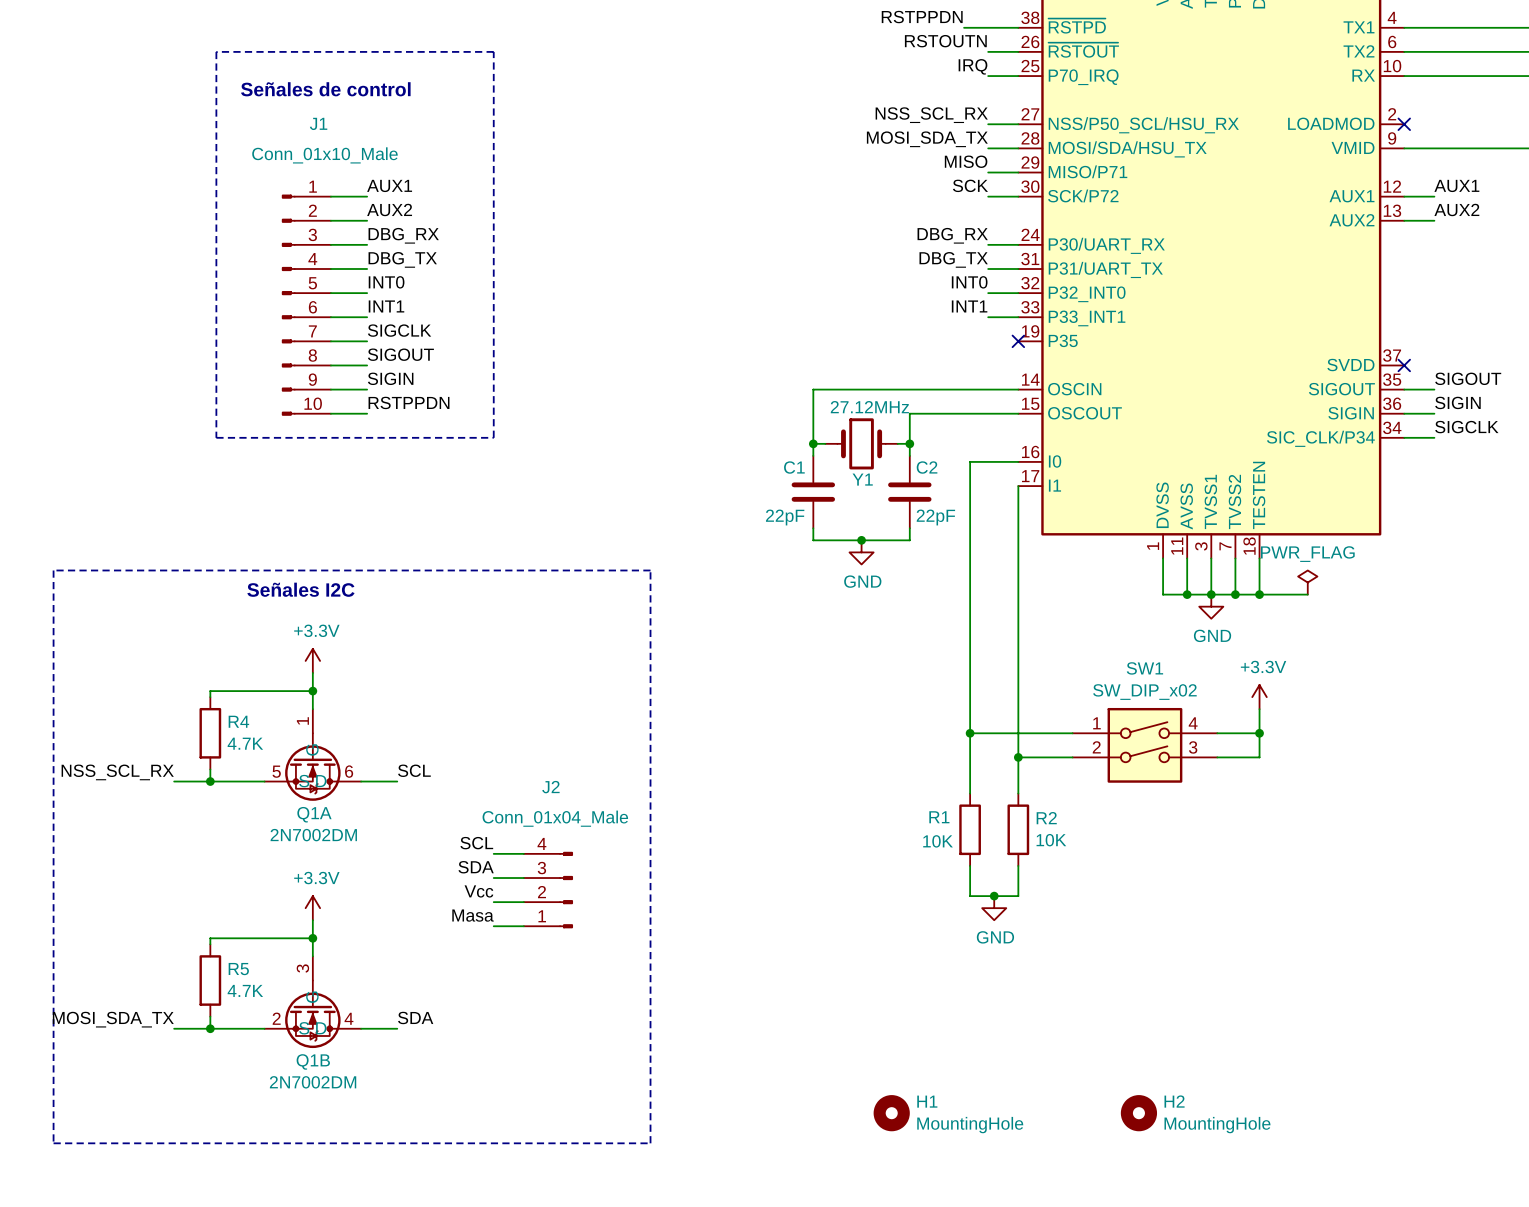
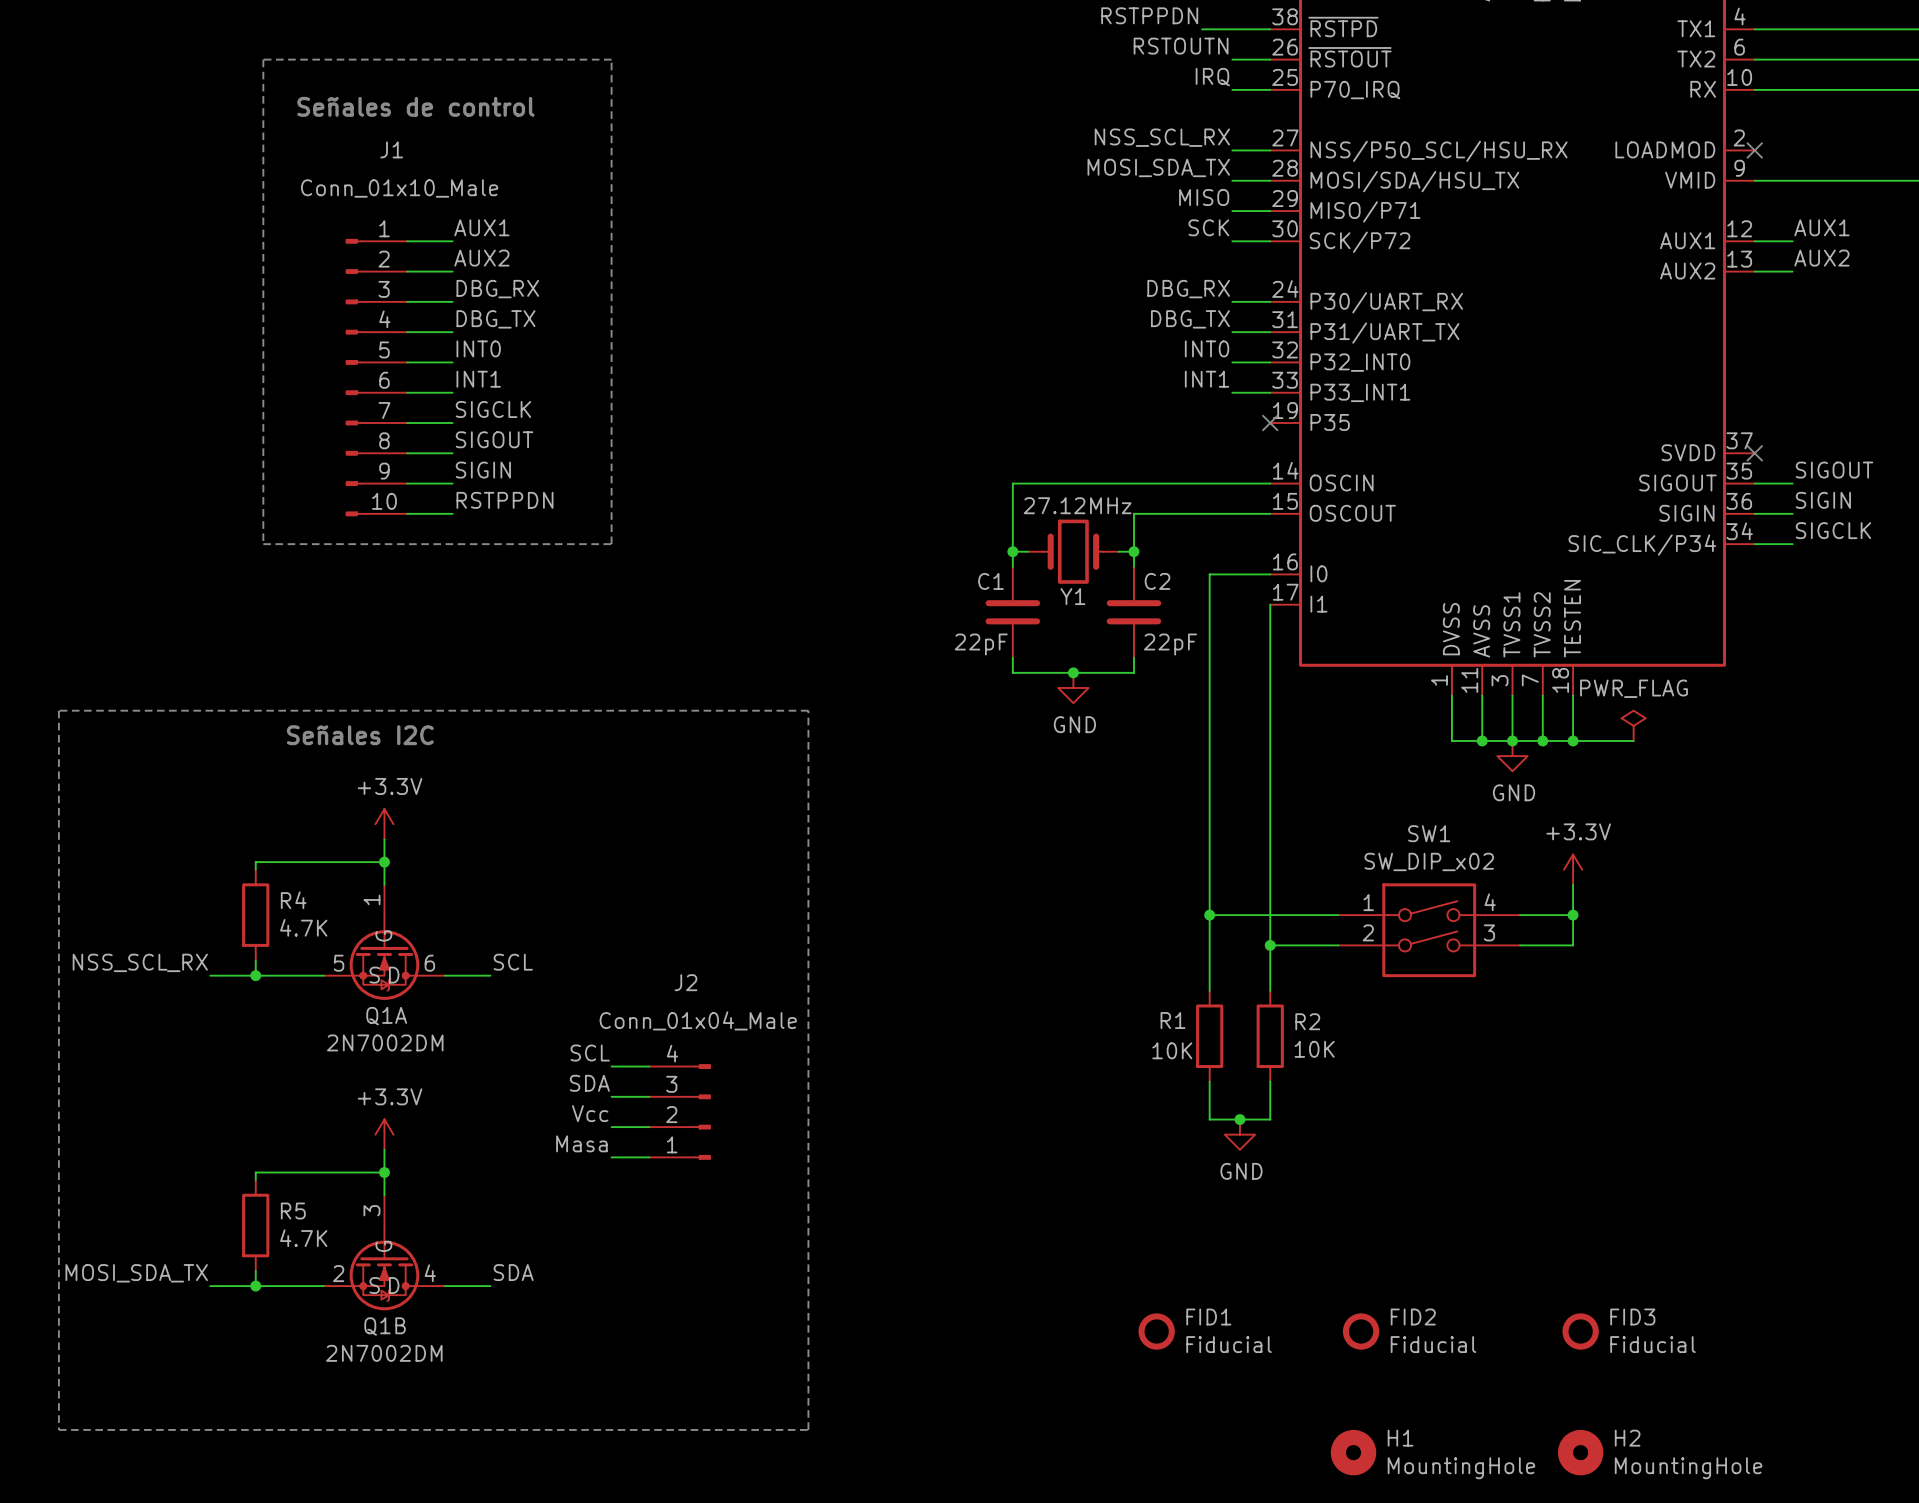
FID1: none -> Fiducial (1156, 1331)
FID2: none -> Fiducial (1361, 1331)
FID3: none -> Fiducial (1580, 1331)
H1 position: (891, 1113) -> (1353, 1452)
H2 position: (1138, 1113) -> (1580, 1452)

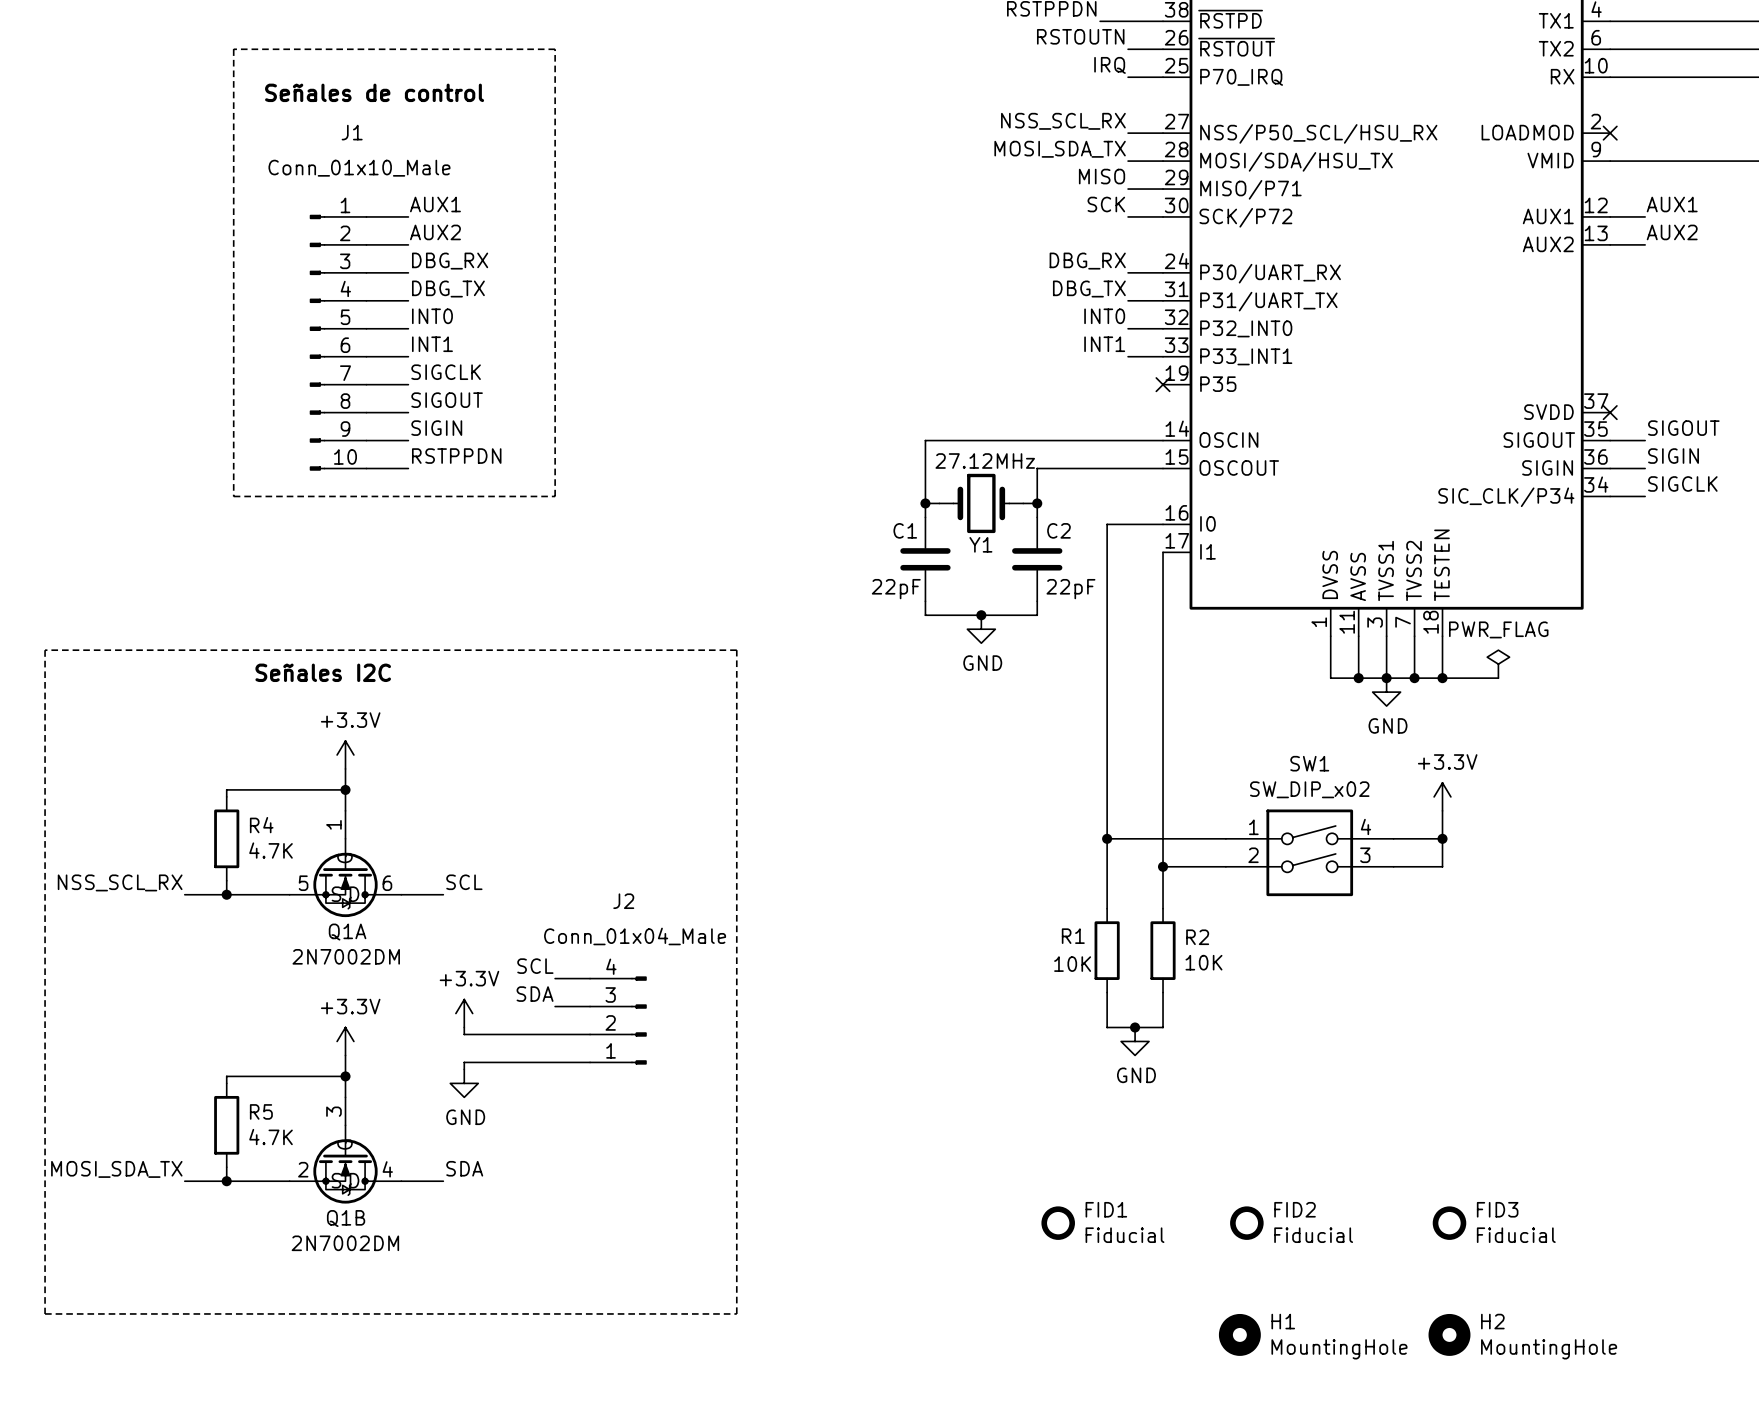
power symbol: none -> +3.3V (464, 1013)
label: Vcc (590, 1113) -> none
wire: none -> (464, 1027) (464, 1034) (555, 1034)
label: Masa (581, 1143) -> none
wire: none -> (555, 1062) (464, 1062) (464, 1069)
power symbol: none -> GND (464, 1083)

